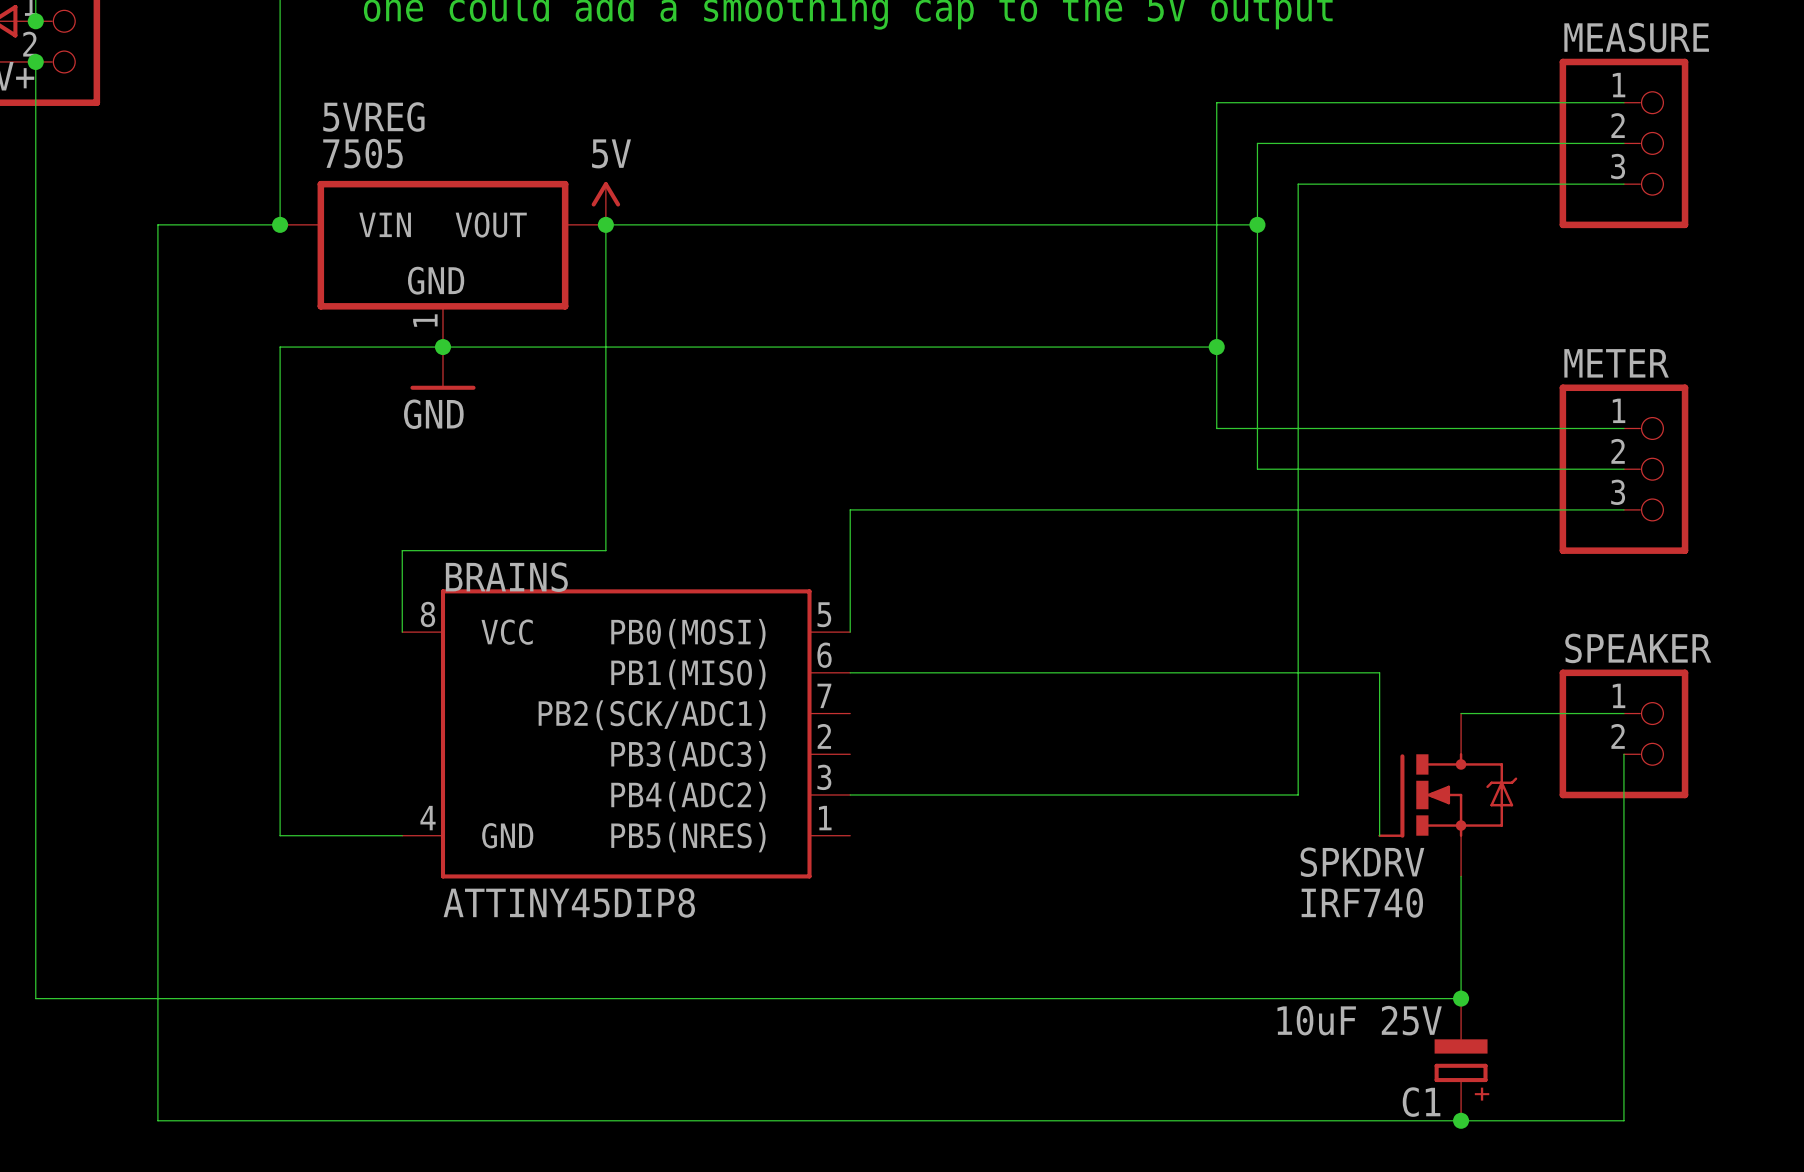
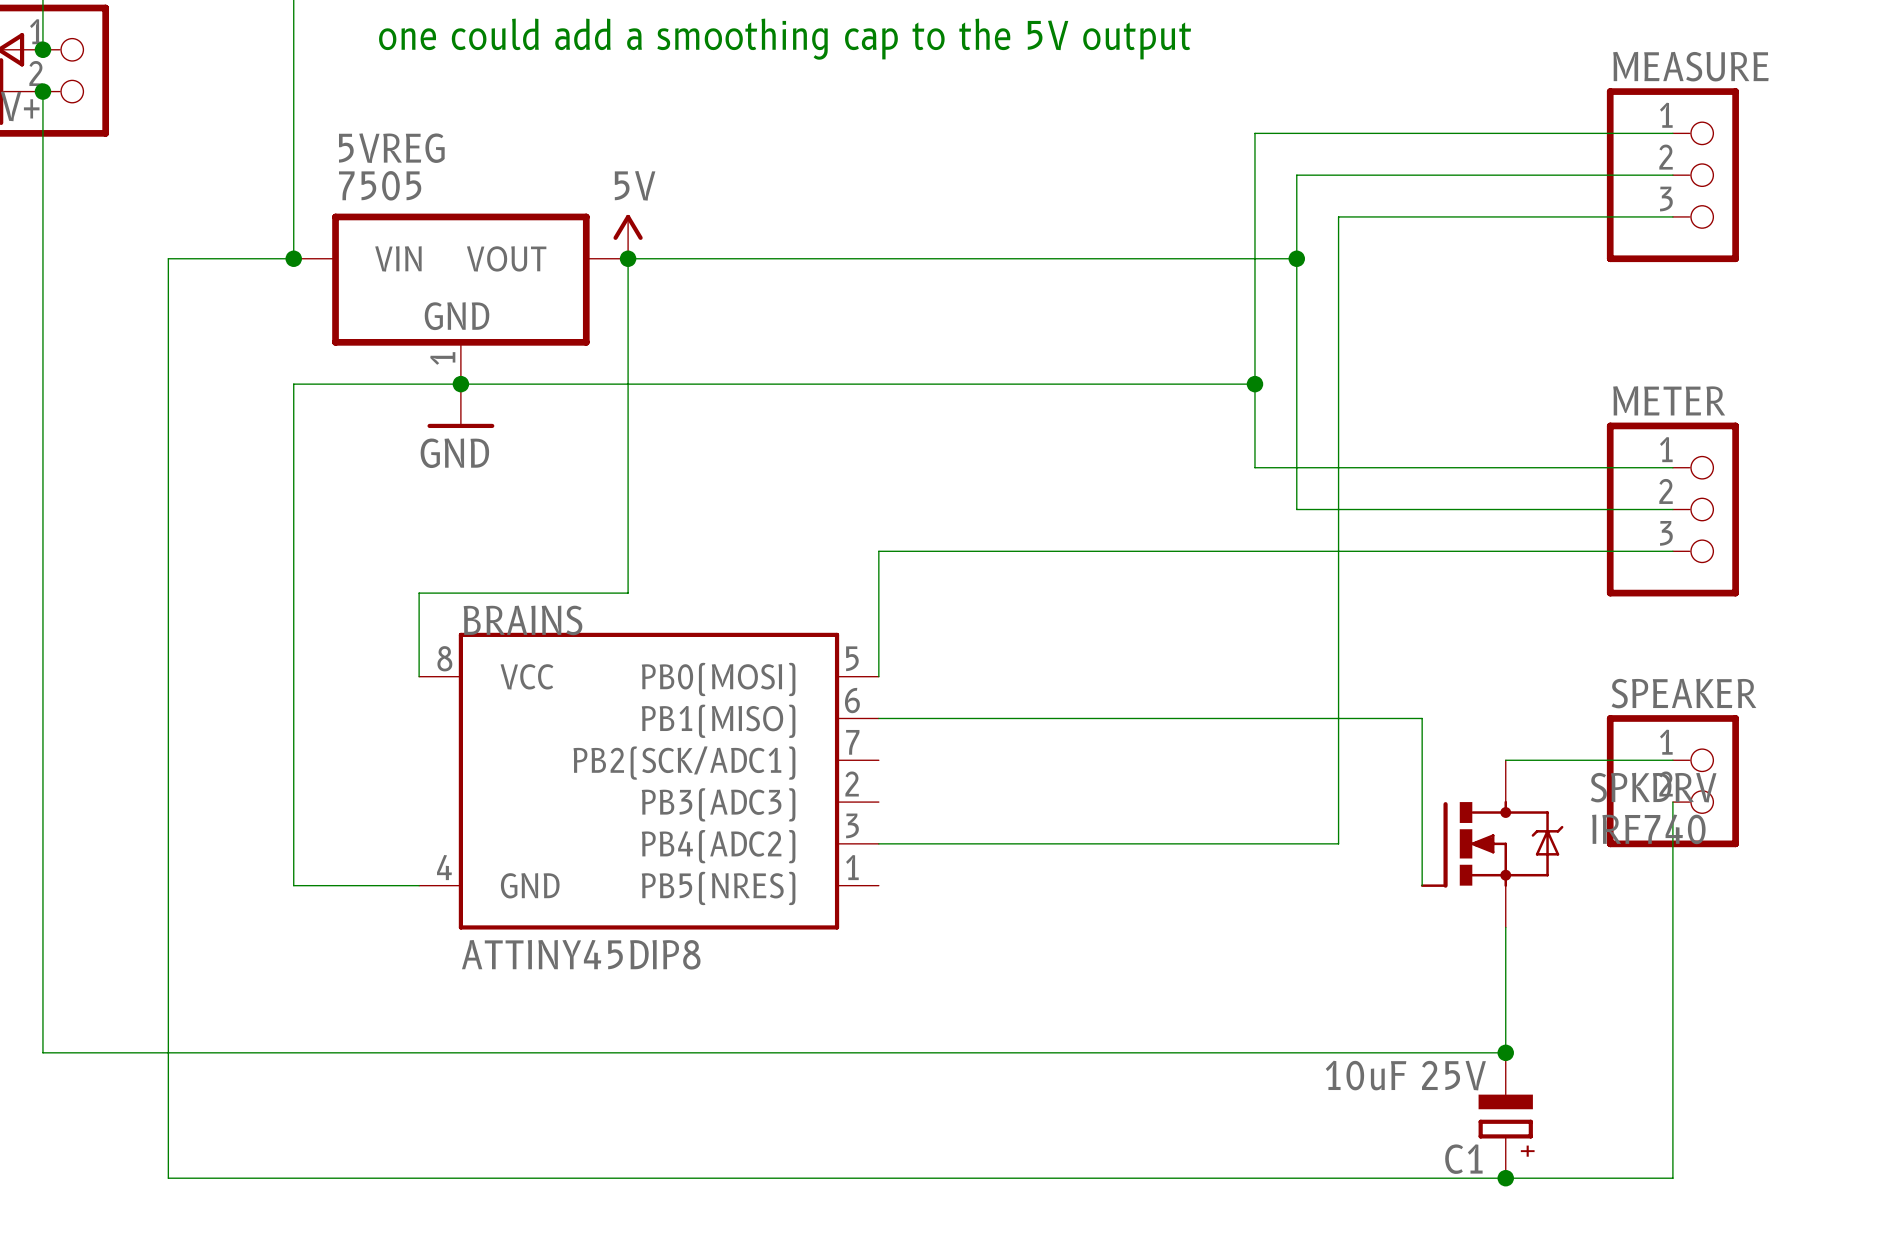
SPKDRV name position: SPKDRV (1362, 862) -> SPKDRV (1653, 787)
SPKDRV value position: IRF740 (1362, 902) -> IRF740 (1648, 829)

